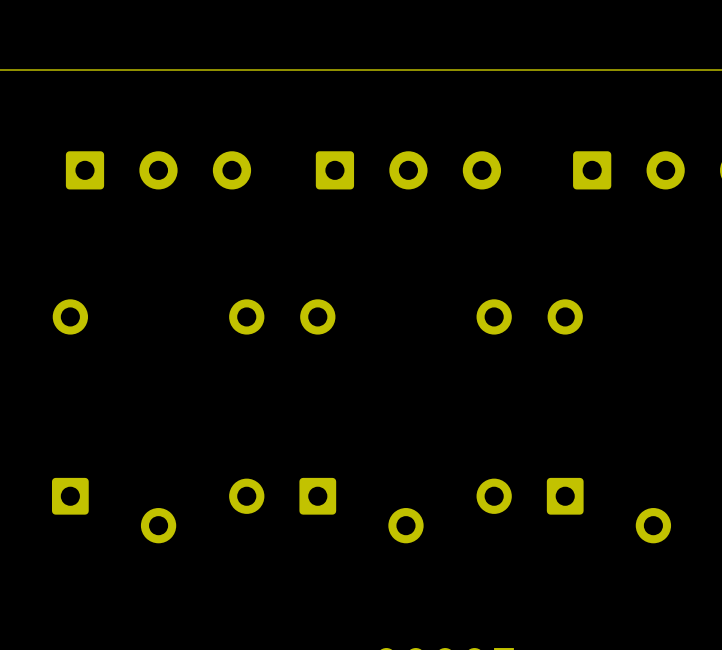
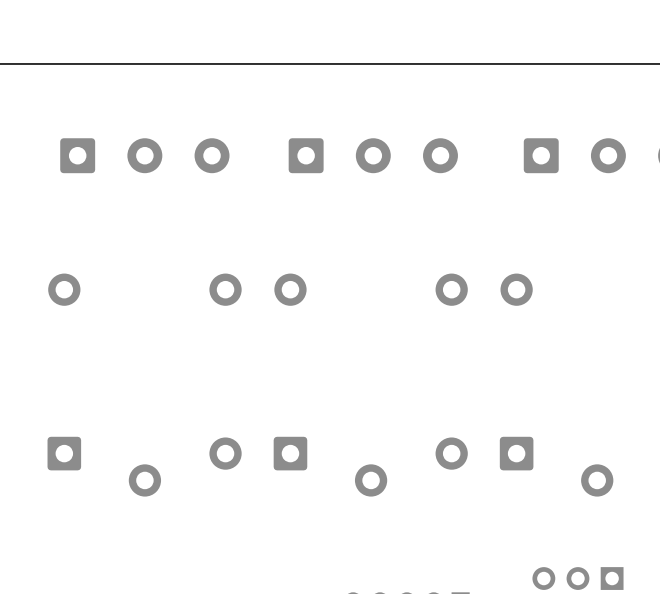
part: none -> (577, 578)

